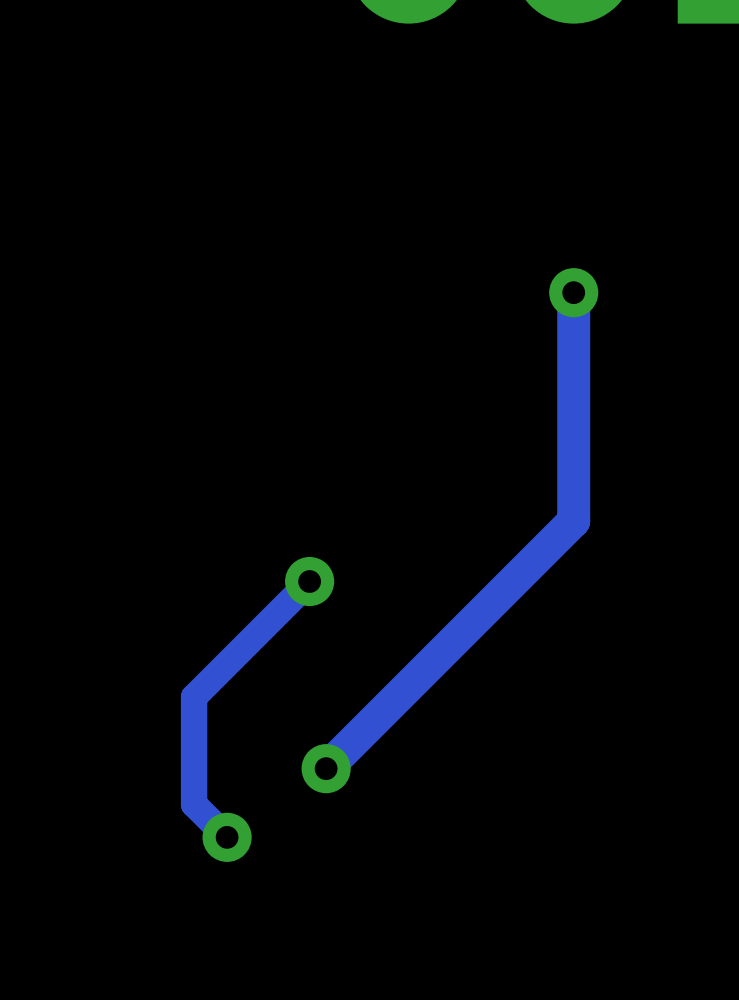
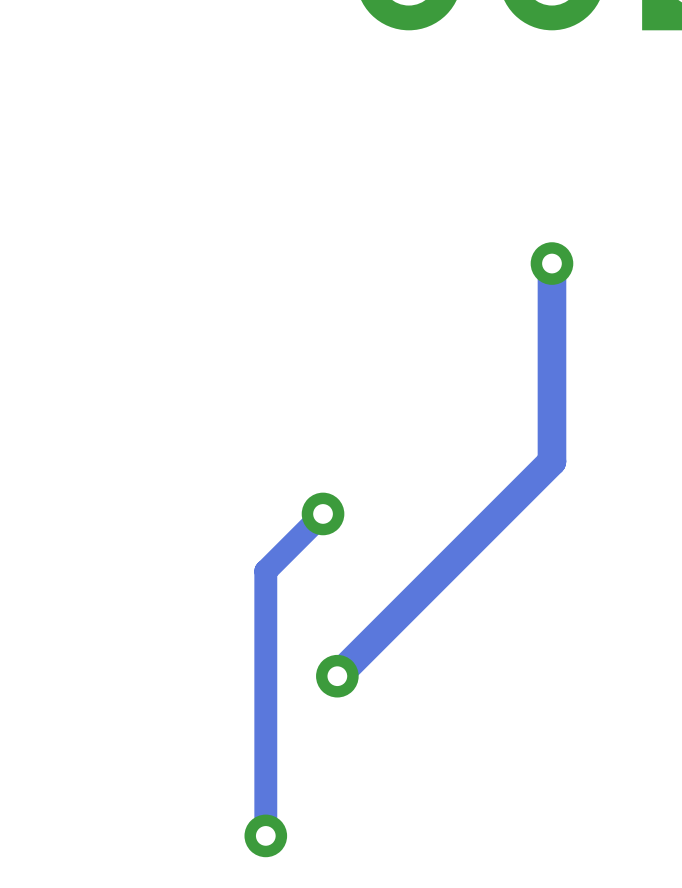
track: (243, 647) (194, 697) (194, 804) (227, 837) -> (265, 571) (265, 835)
via position: (227, 837) -> (265, 835)

